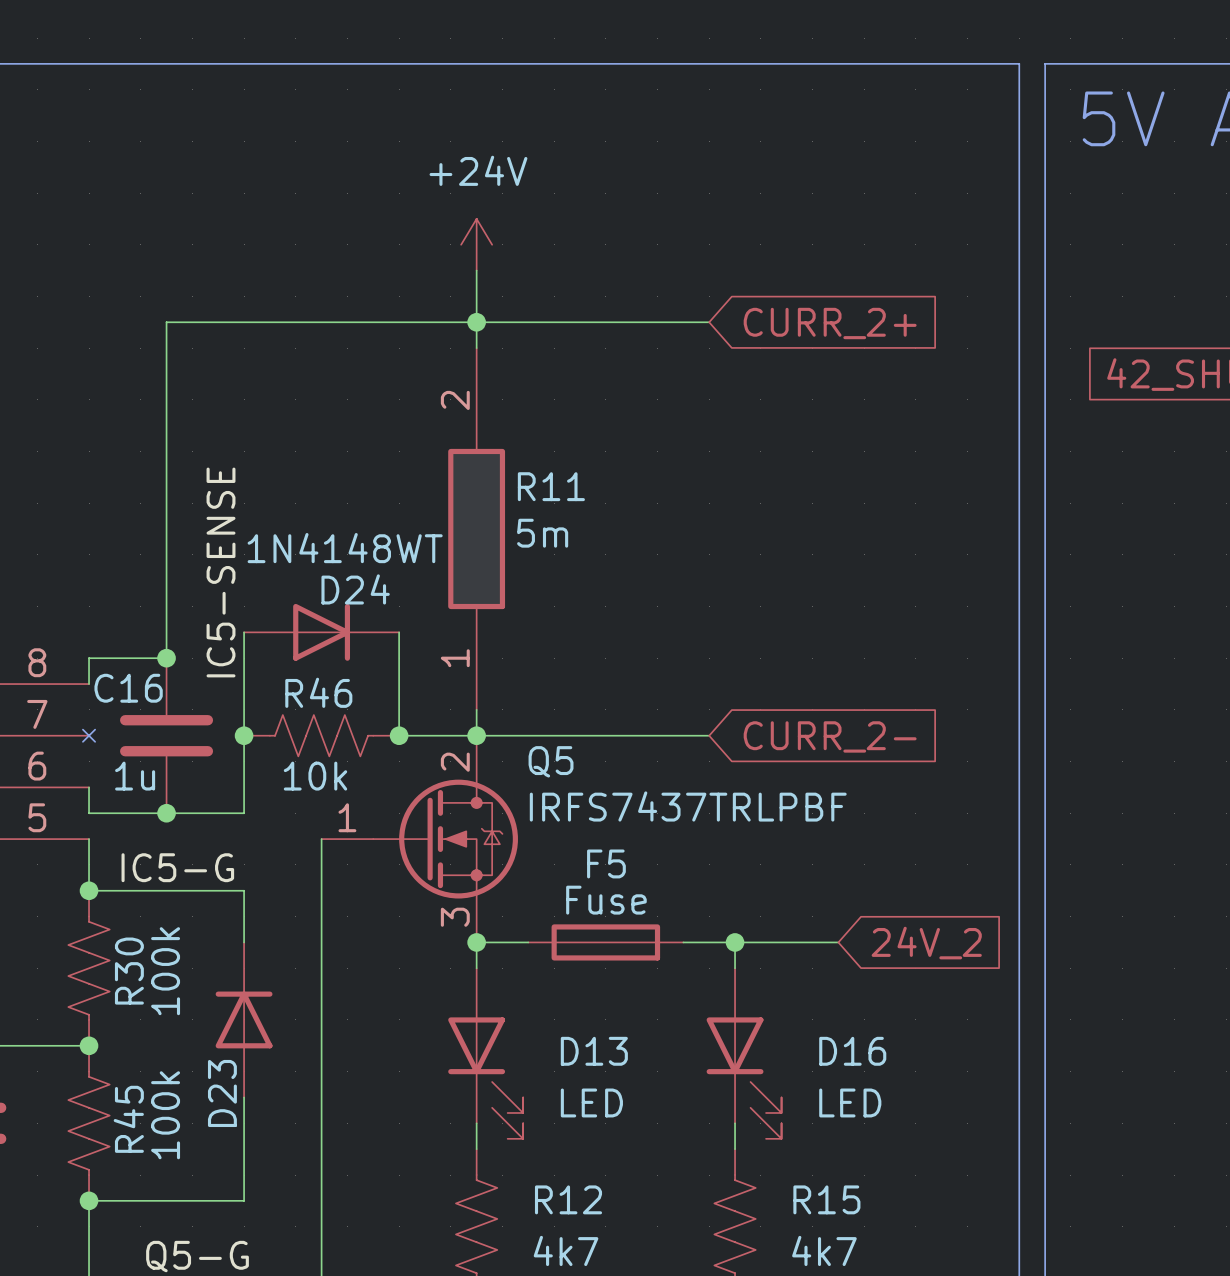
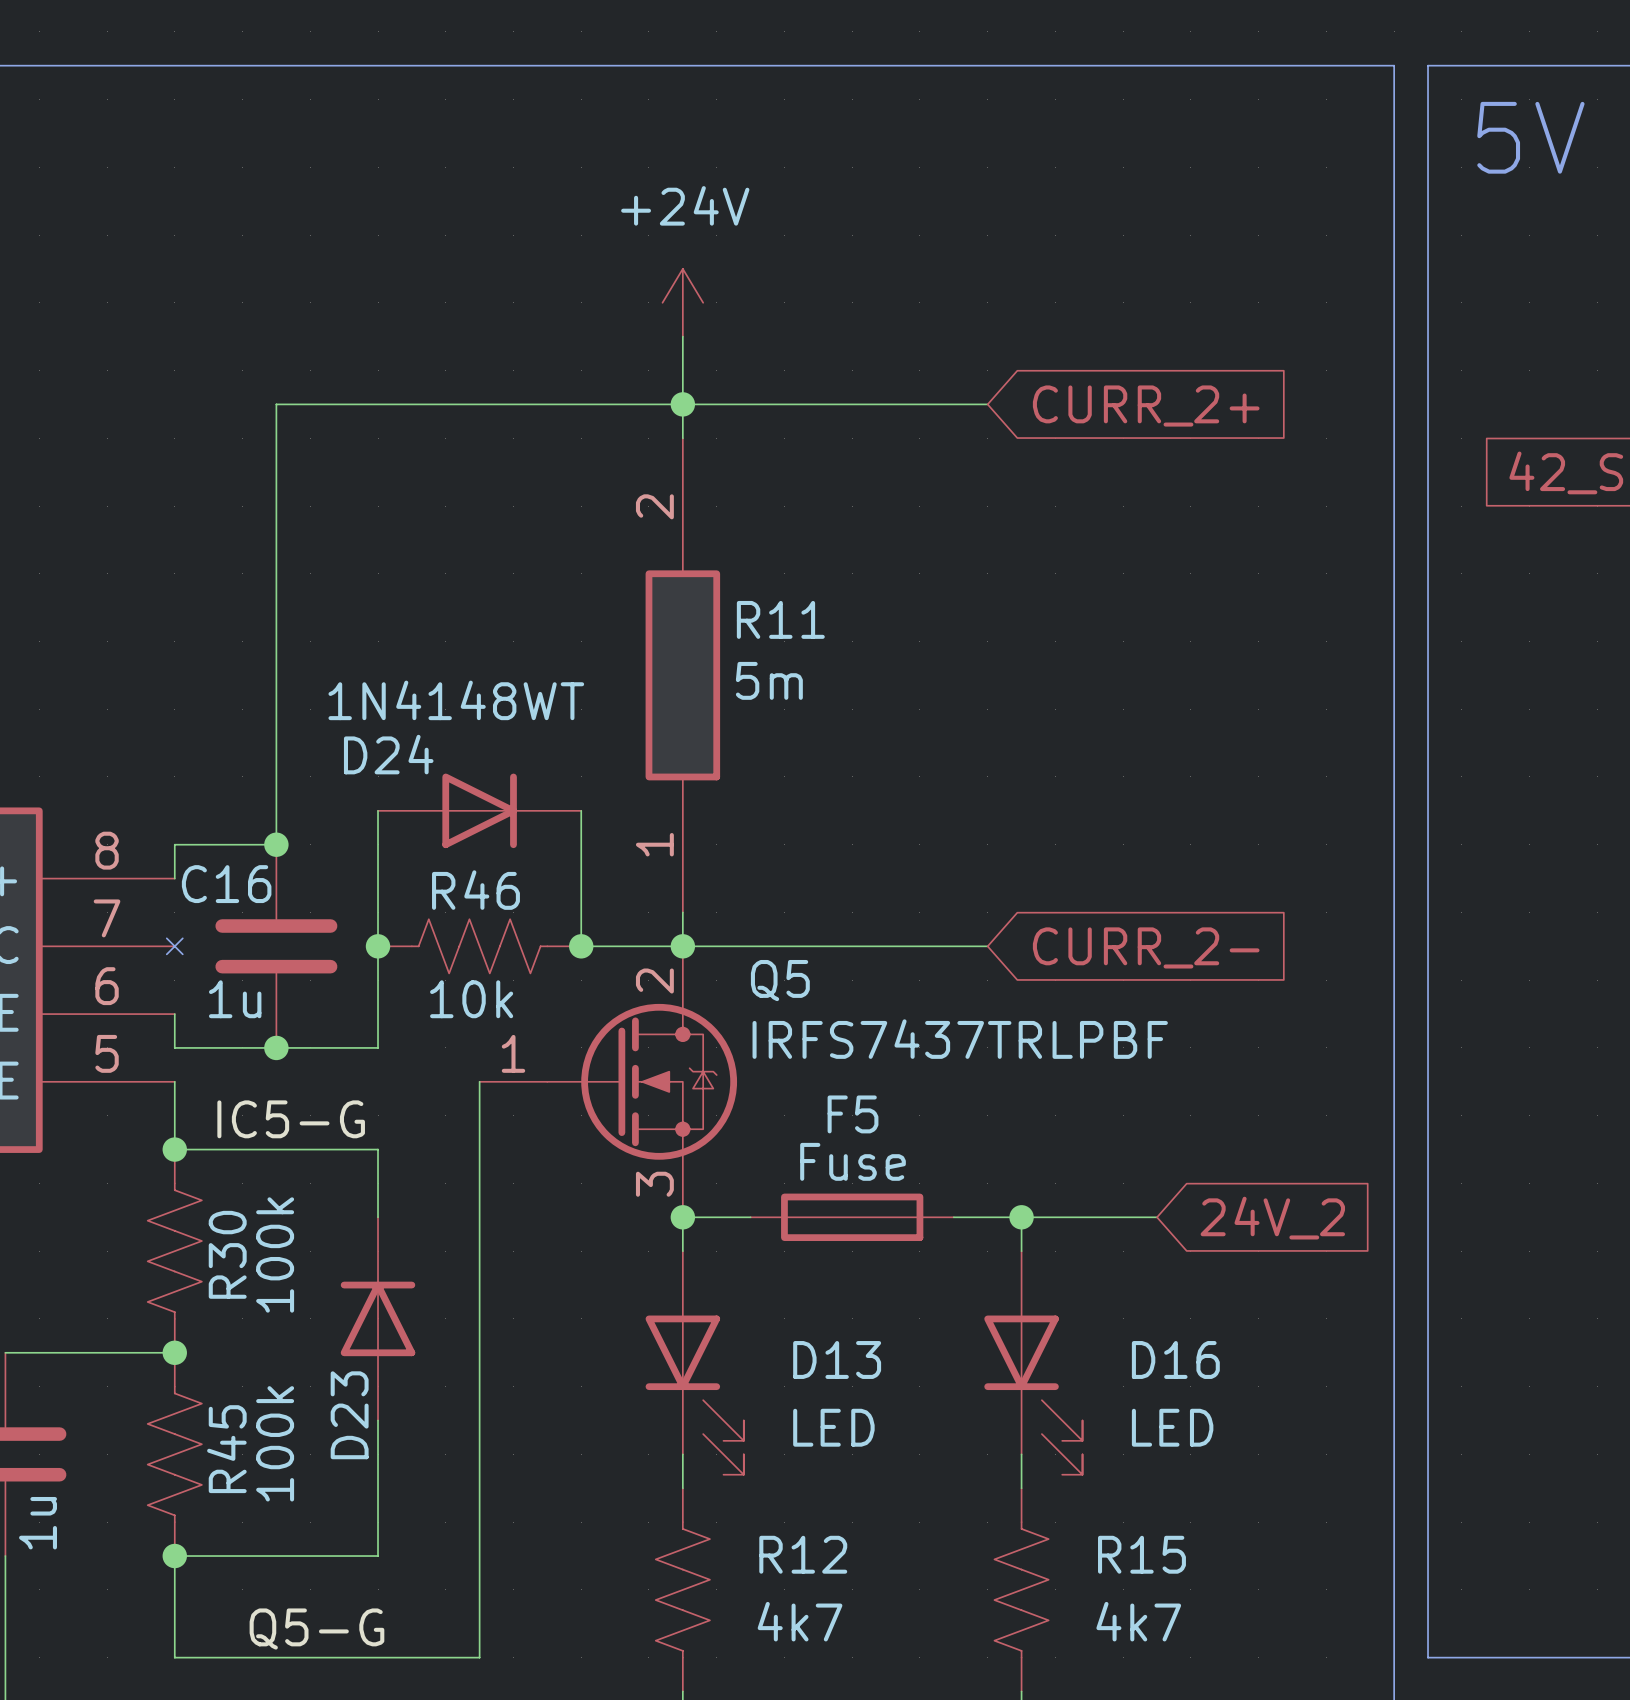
D24 value position: 1N4148WT (345, 548) -> 1N4148WT (456, 700)
label: IC5-SENSE (221, 572) -> none
D24 name position: D24 (355, 589) -> D24 (388, 754)

